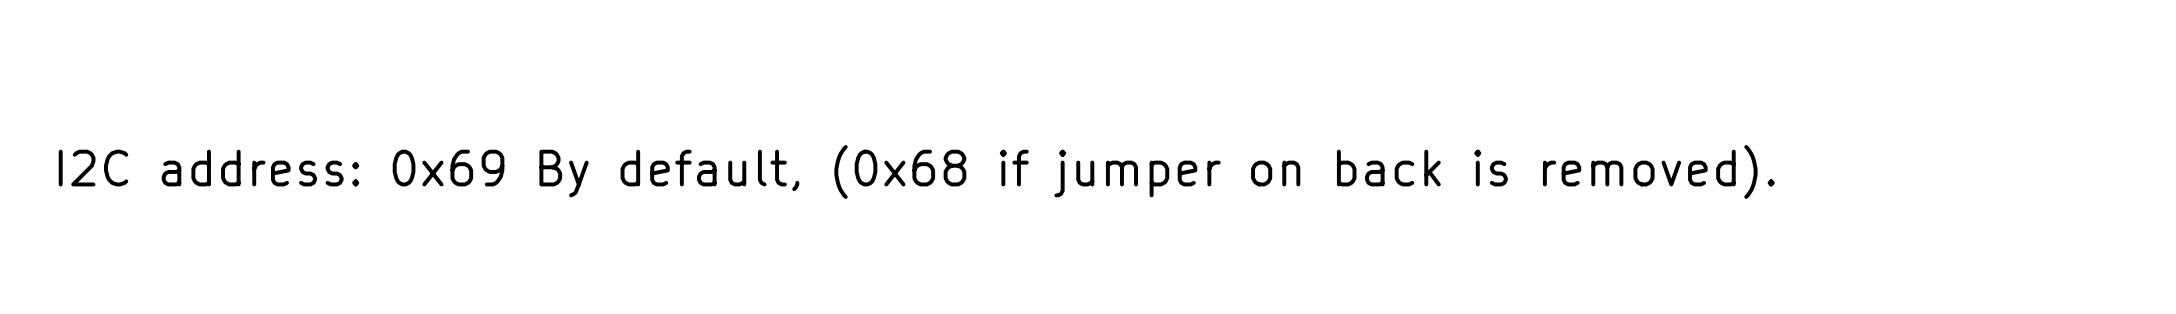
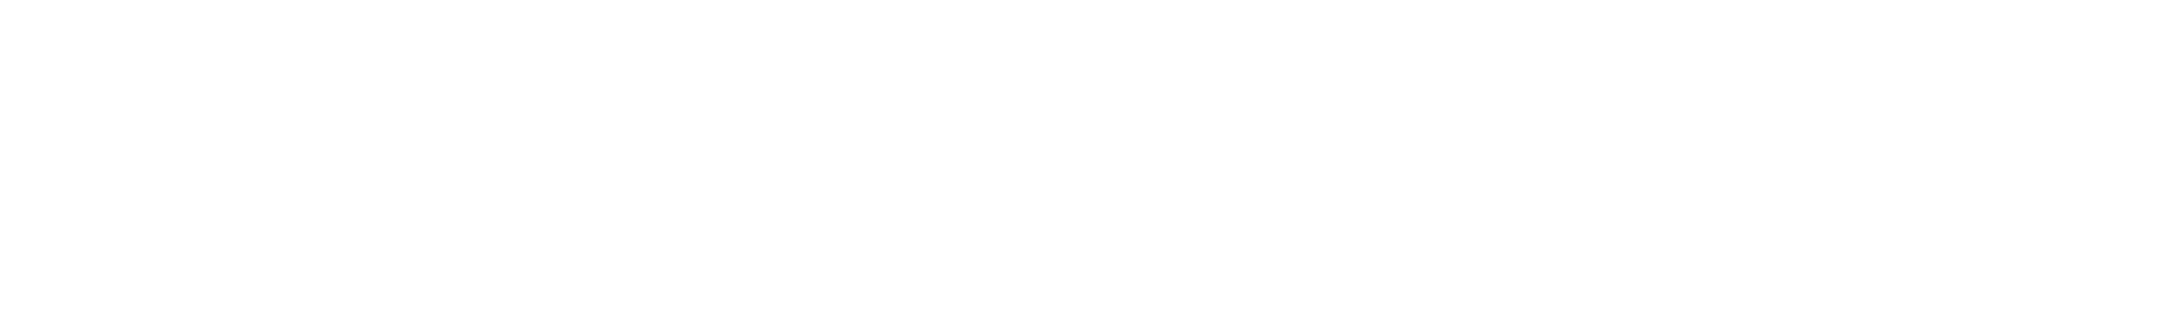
text: I2C address: 0x69 By default, (0x68 if jumper on back is removed). (916, 171) -> none

